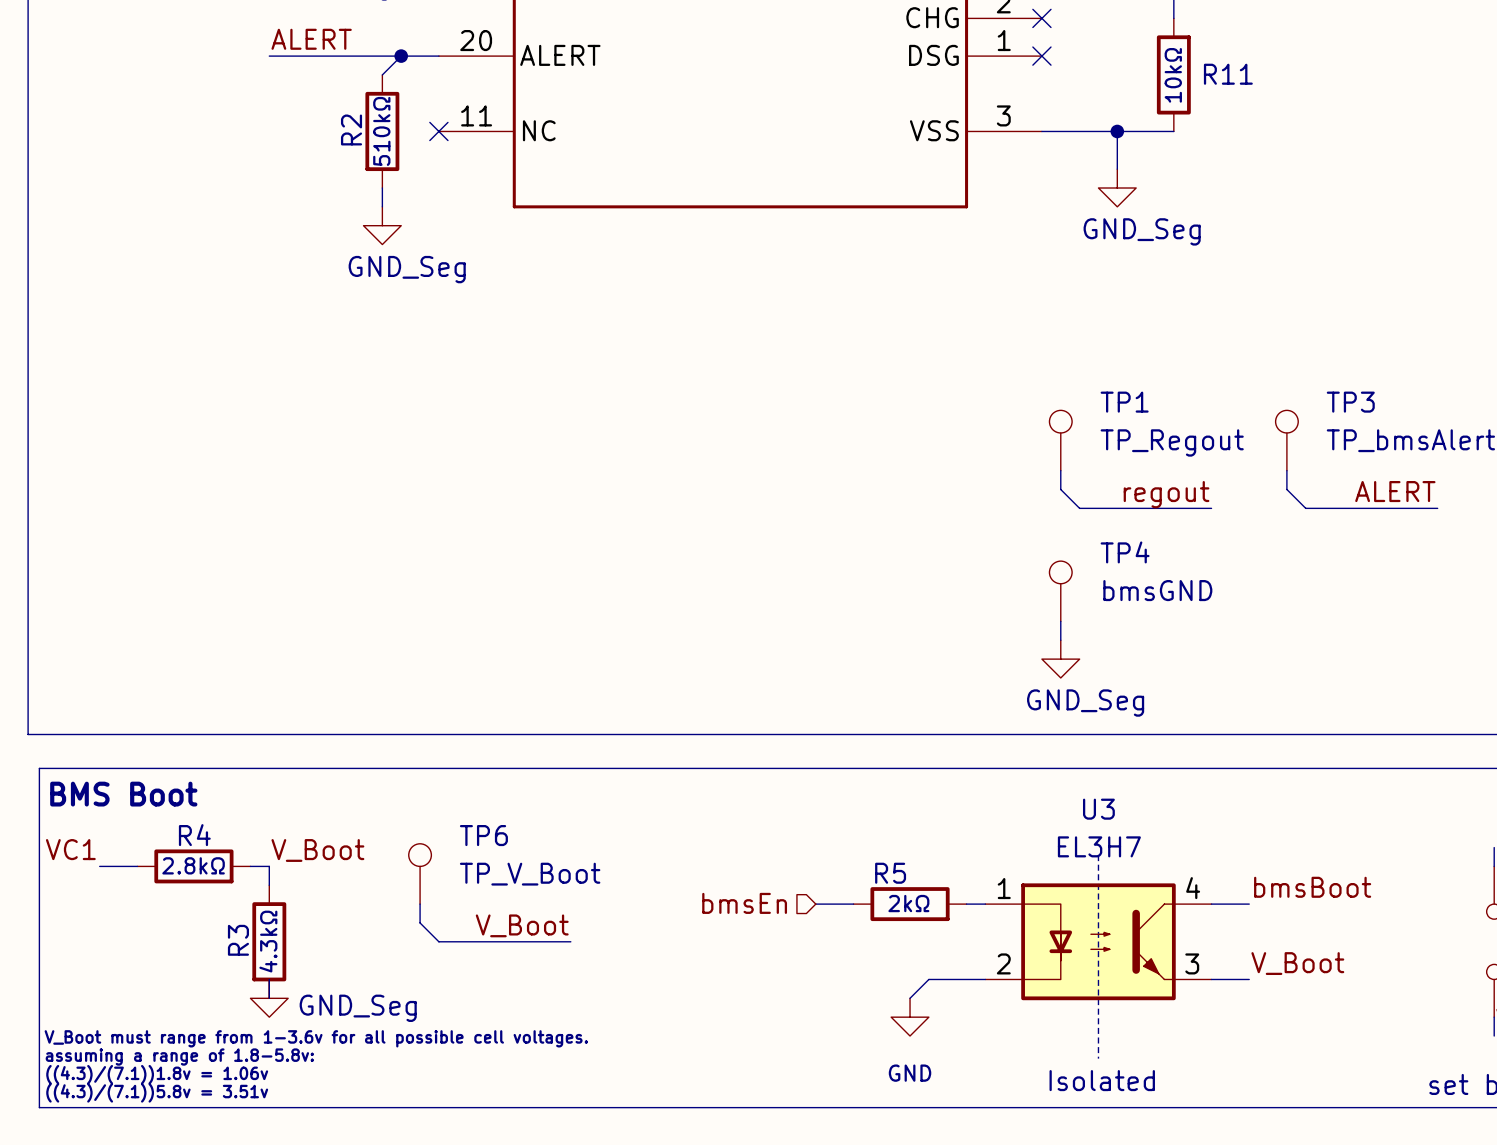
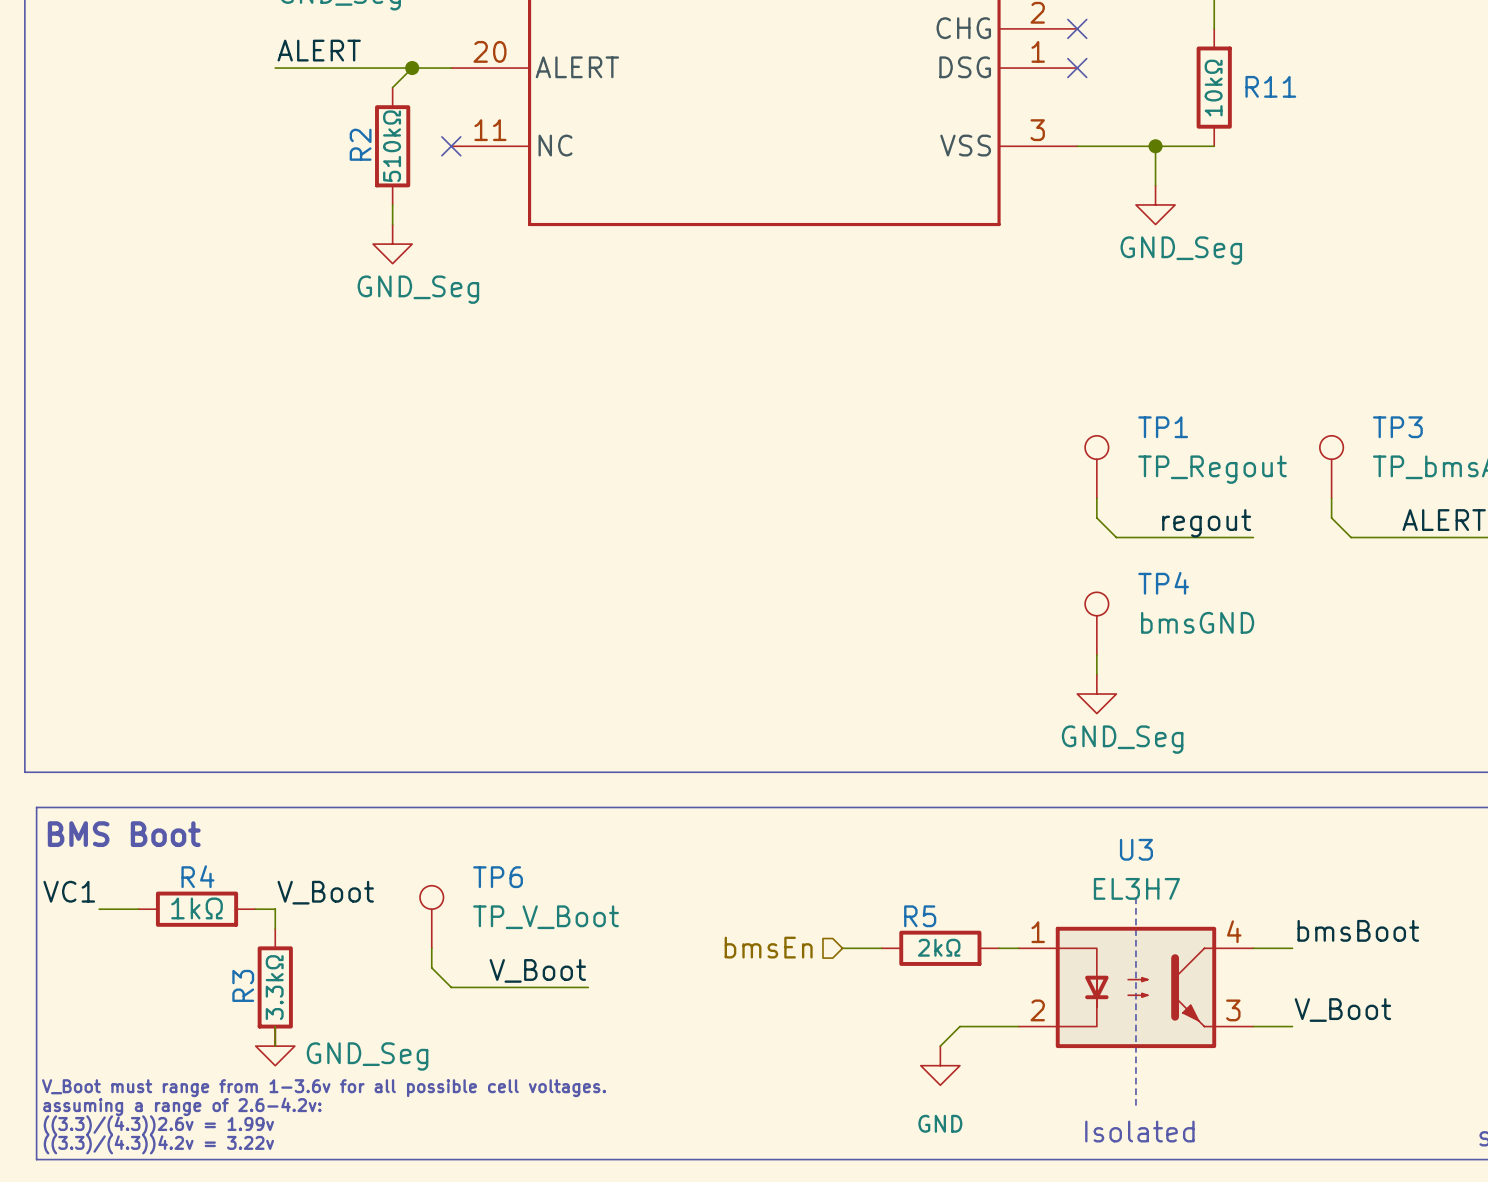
R4 value: 2.8kΩ (193, 865) -> 1kΩ (197, 908)
R3 value: 4.3kΩ (268, 941) -> 3.3kΩ (274, 987)
text: assuming a range of 1.8-5.8v: (179, 1057) -> assuming a range of 2.6-4.2v: (182, 1106)
text: ((4.3)/(7.1))1.8v = 1.06v (157, 1074) -> ((3.3)/(4.3))2.6v = 1.99v (158, 1125)
text: ((4.3)/(7.1))5.8v = 3.51v (157, 1092) -> ((3.3)/(4.3))4.2v = 3.22v (158, 1144)

